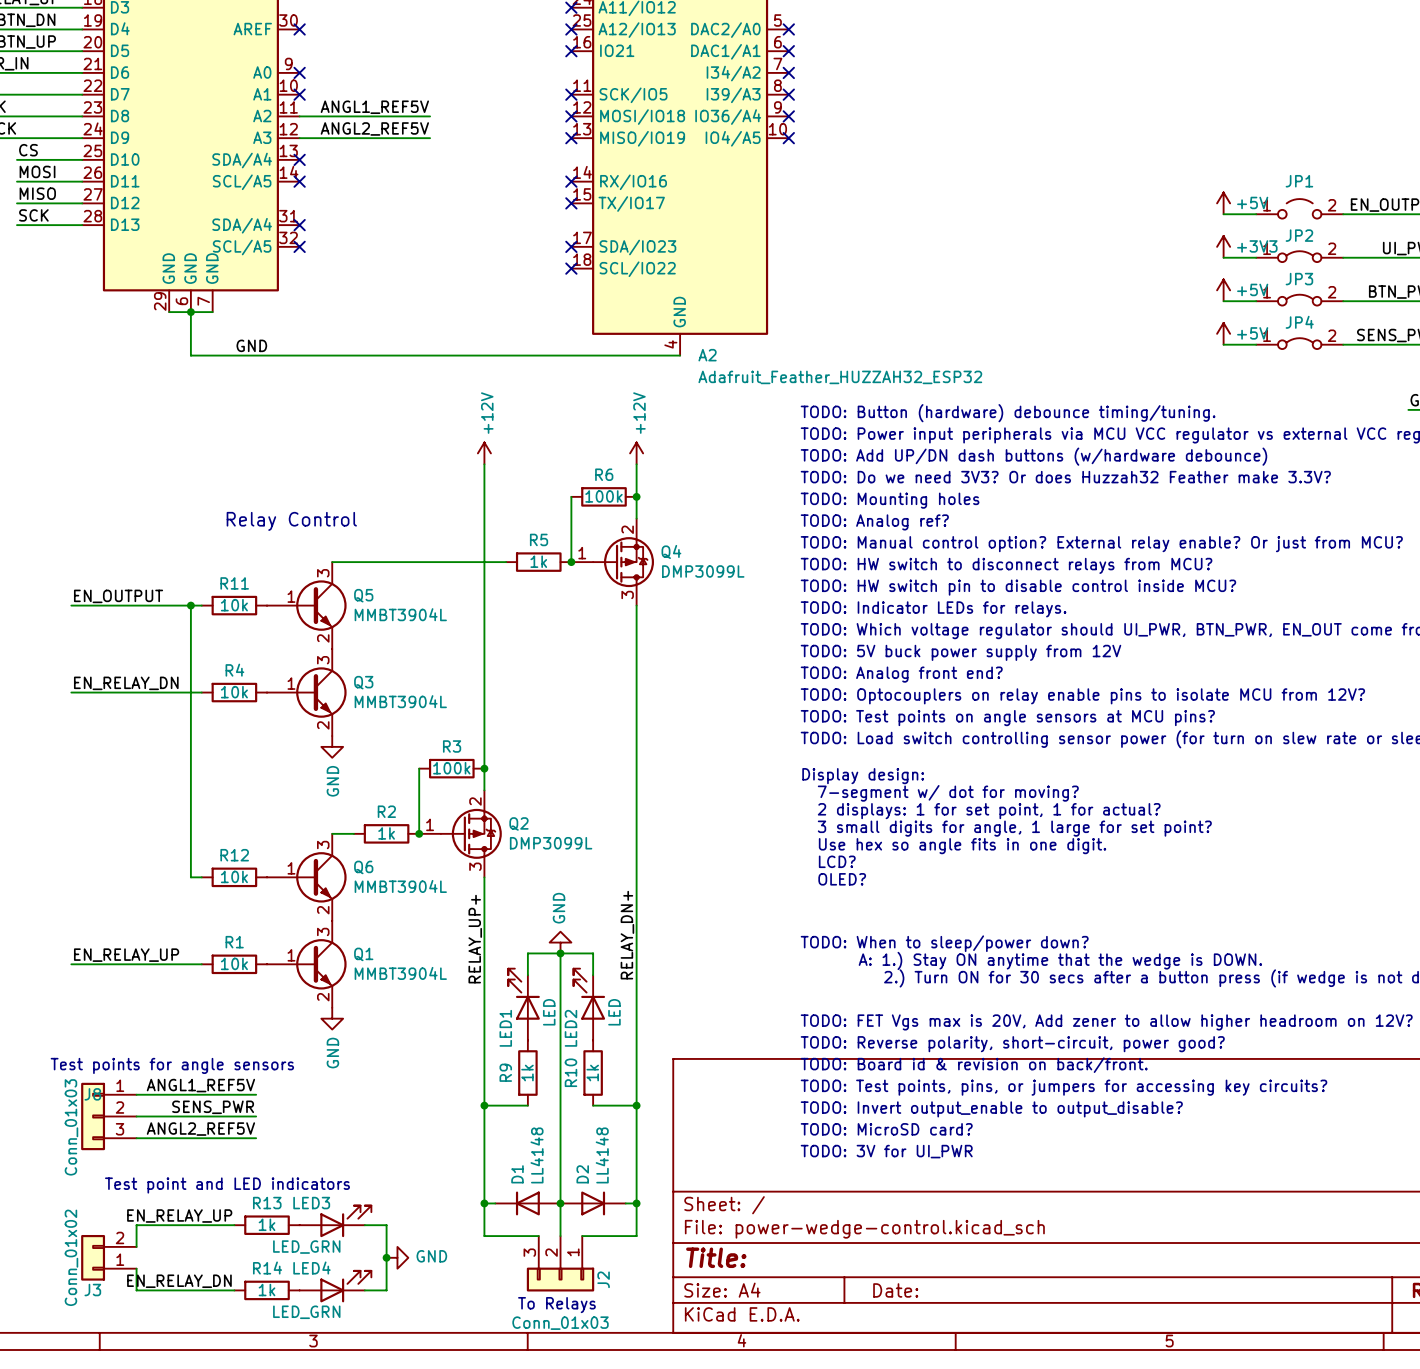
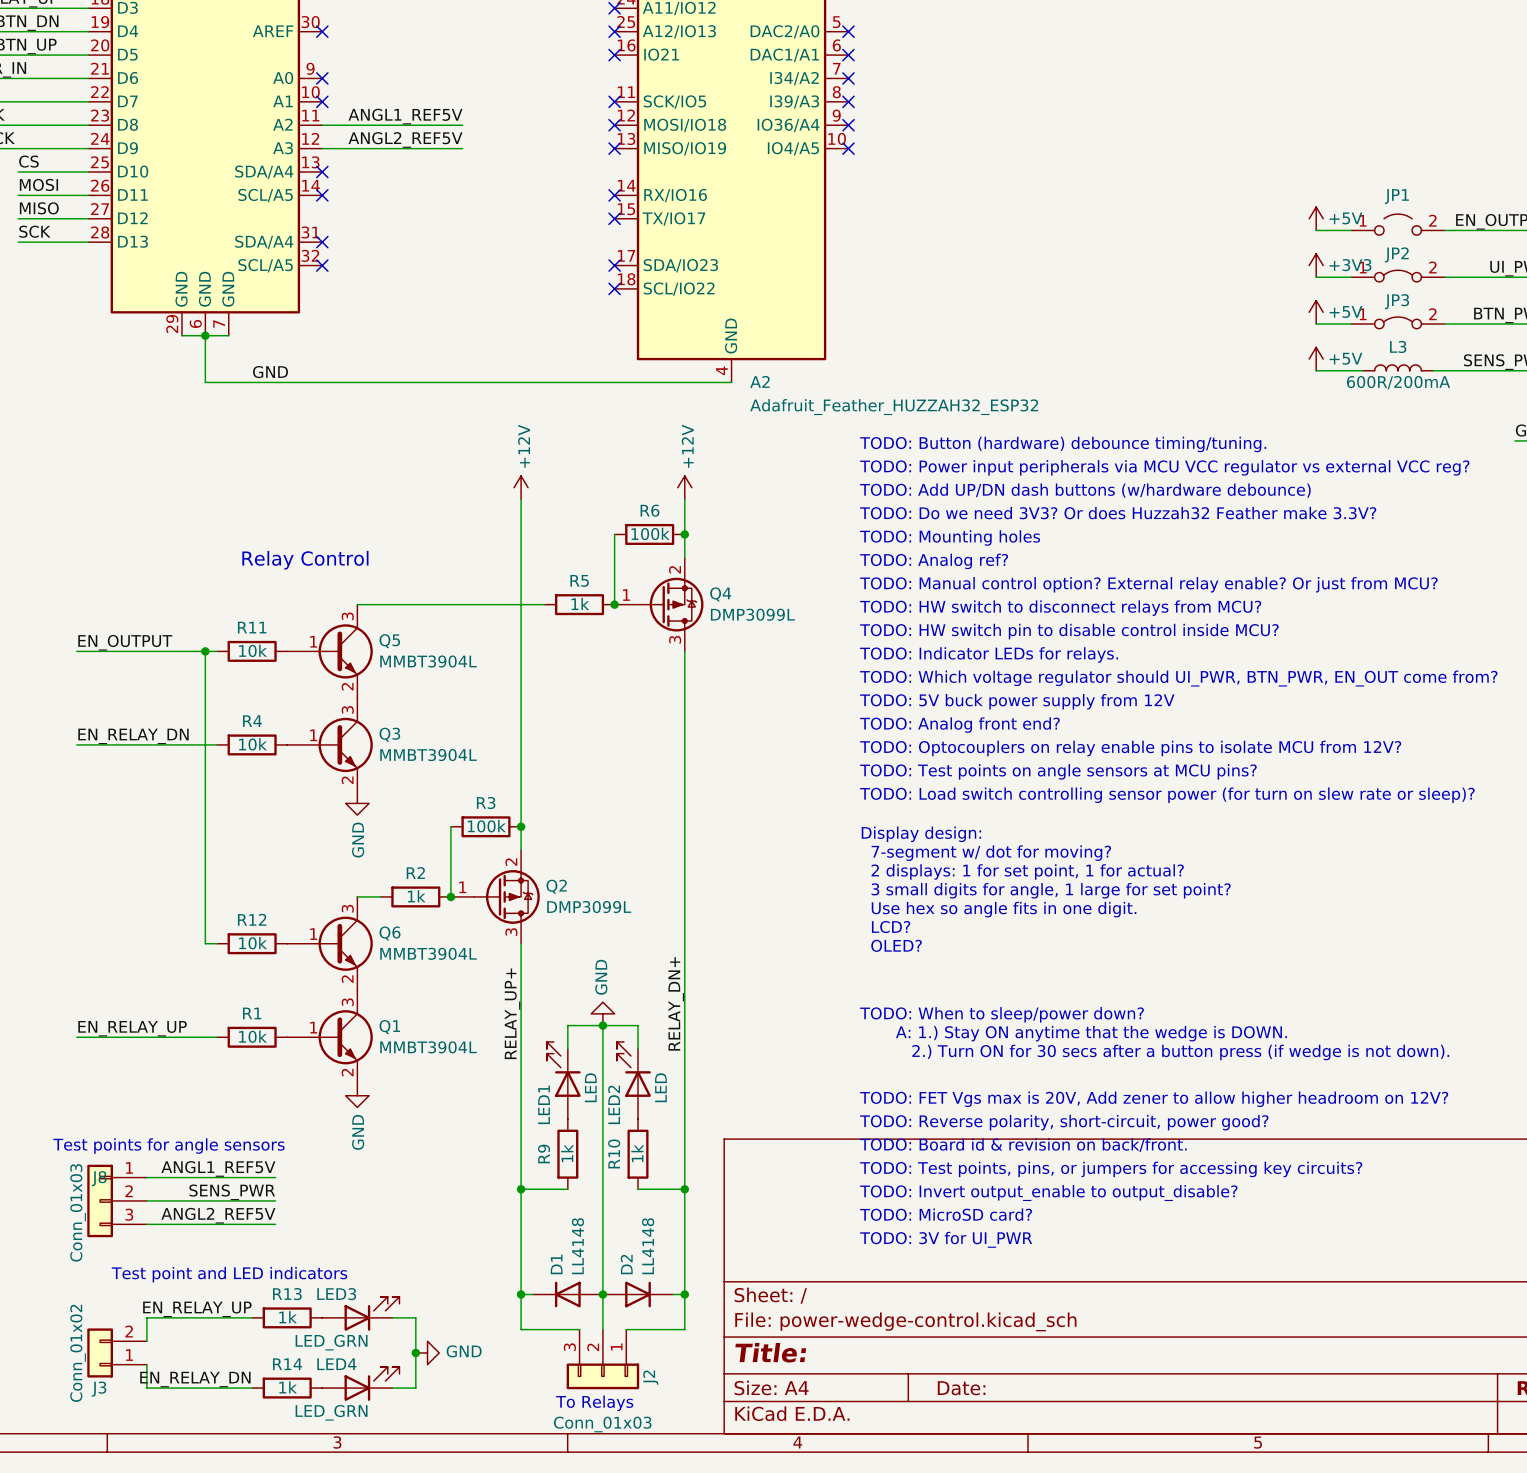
L3: none -> 600R/200mA (1398, 367)
JP4: (1299, 343) -> none

